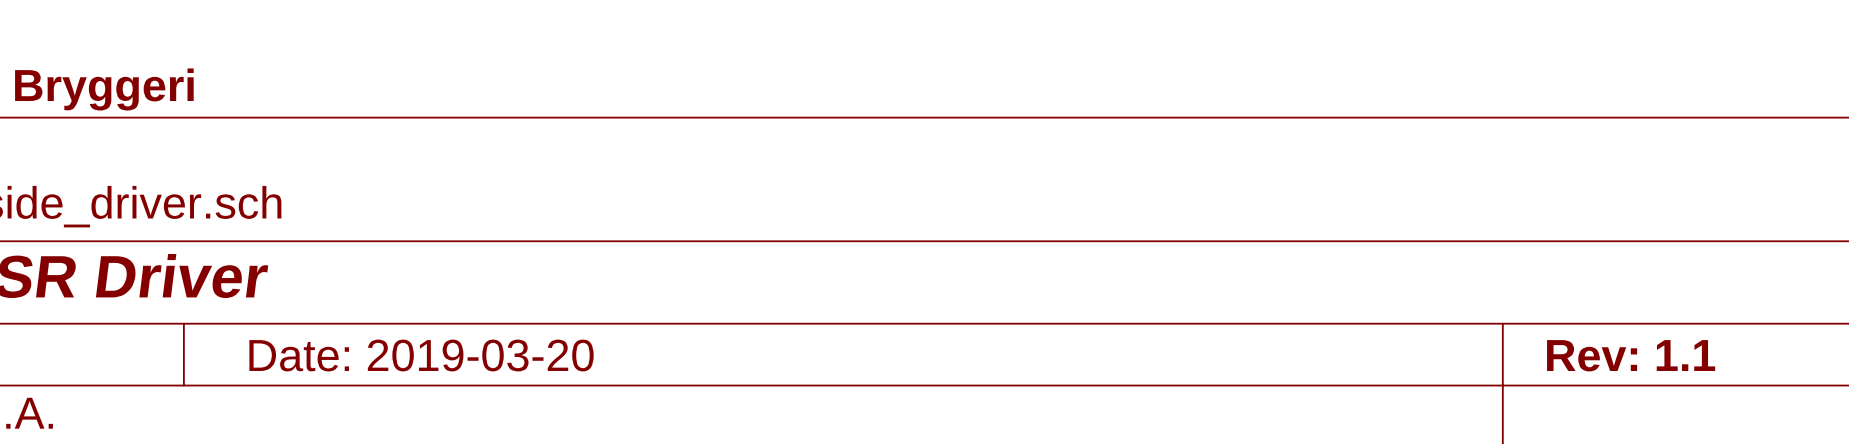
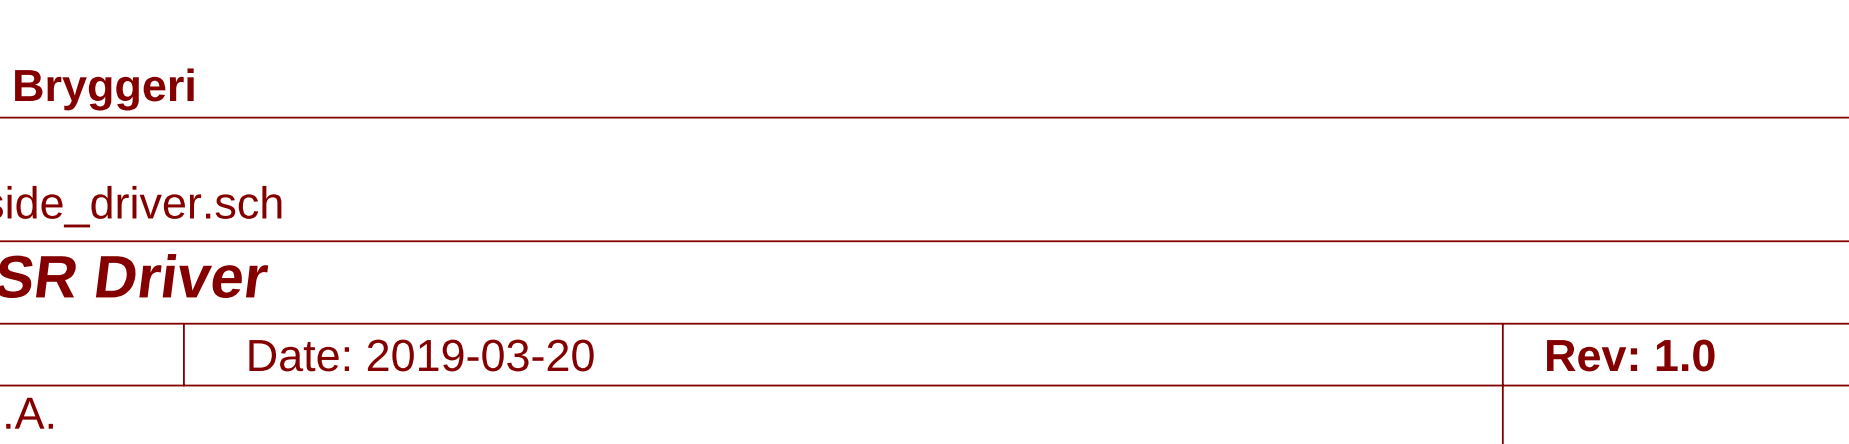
title block: Rev: 1.1 (1631, 355) -> Rev: 1.0 (1630, 355)

